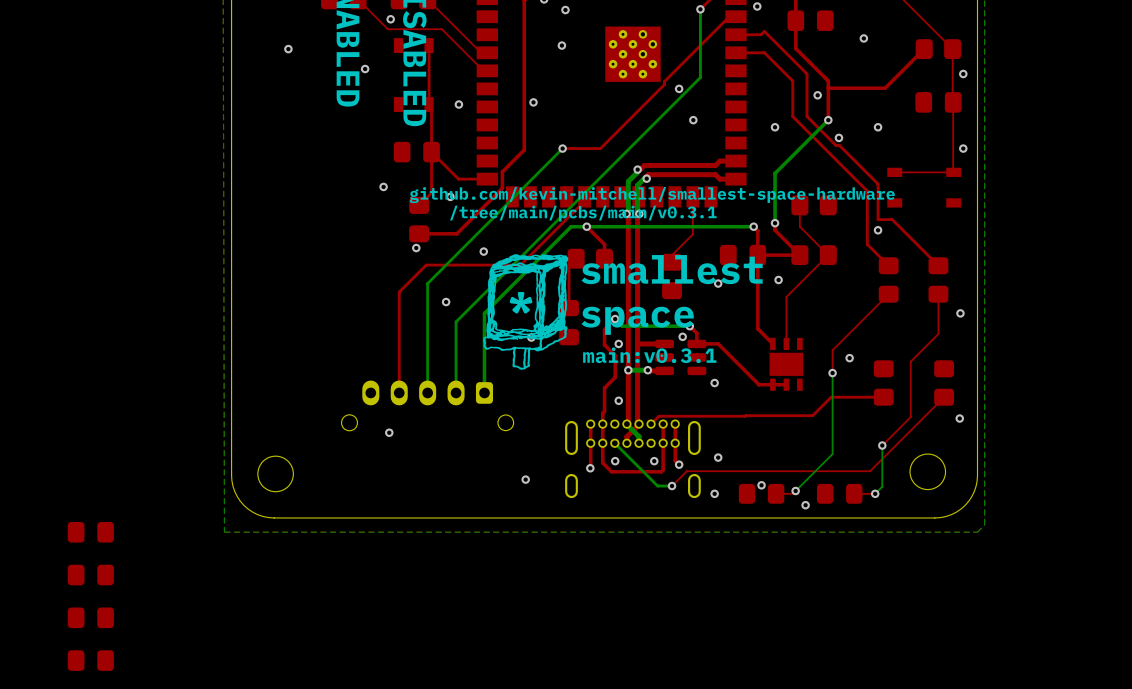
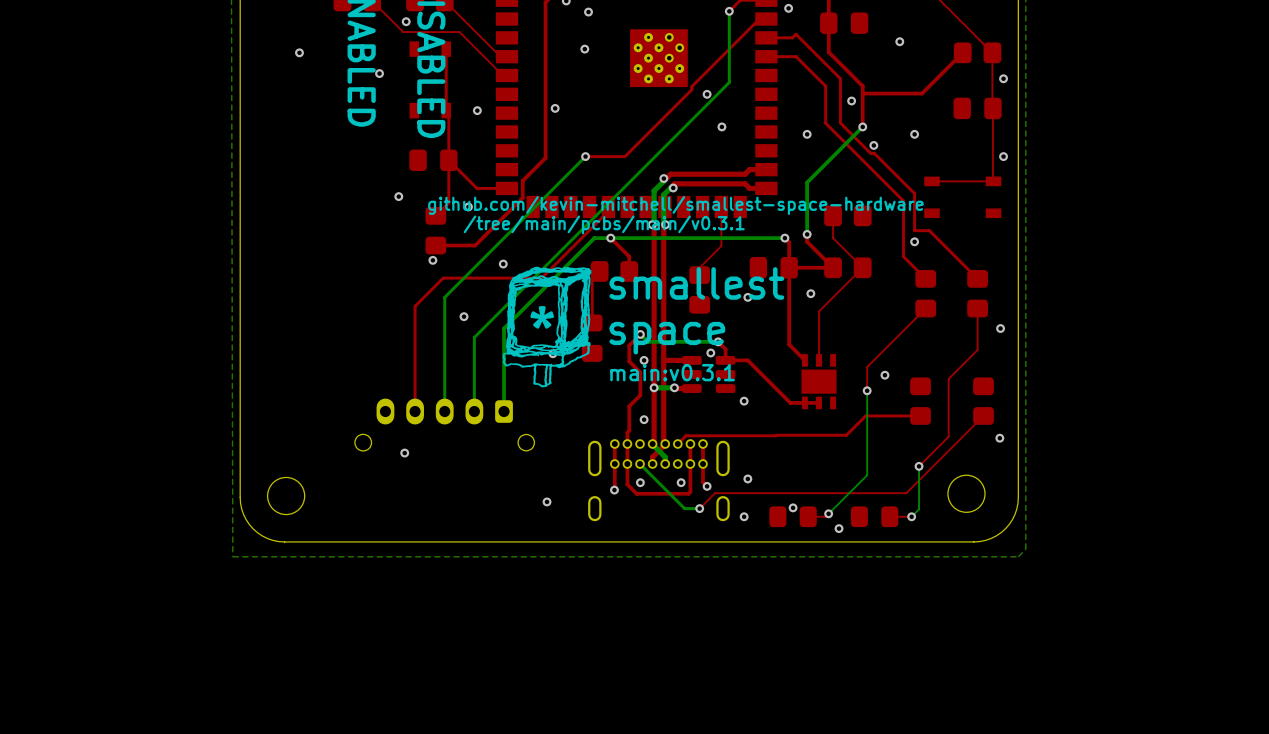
part: (90, 532) -> none
part: (90, 575) -> none
part: (90, 617) -> none
part: (90, 660) -> none

